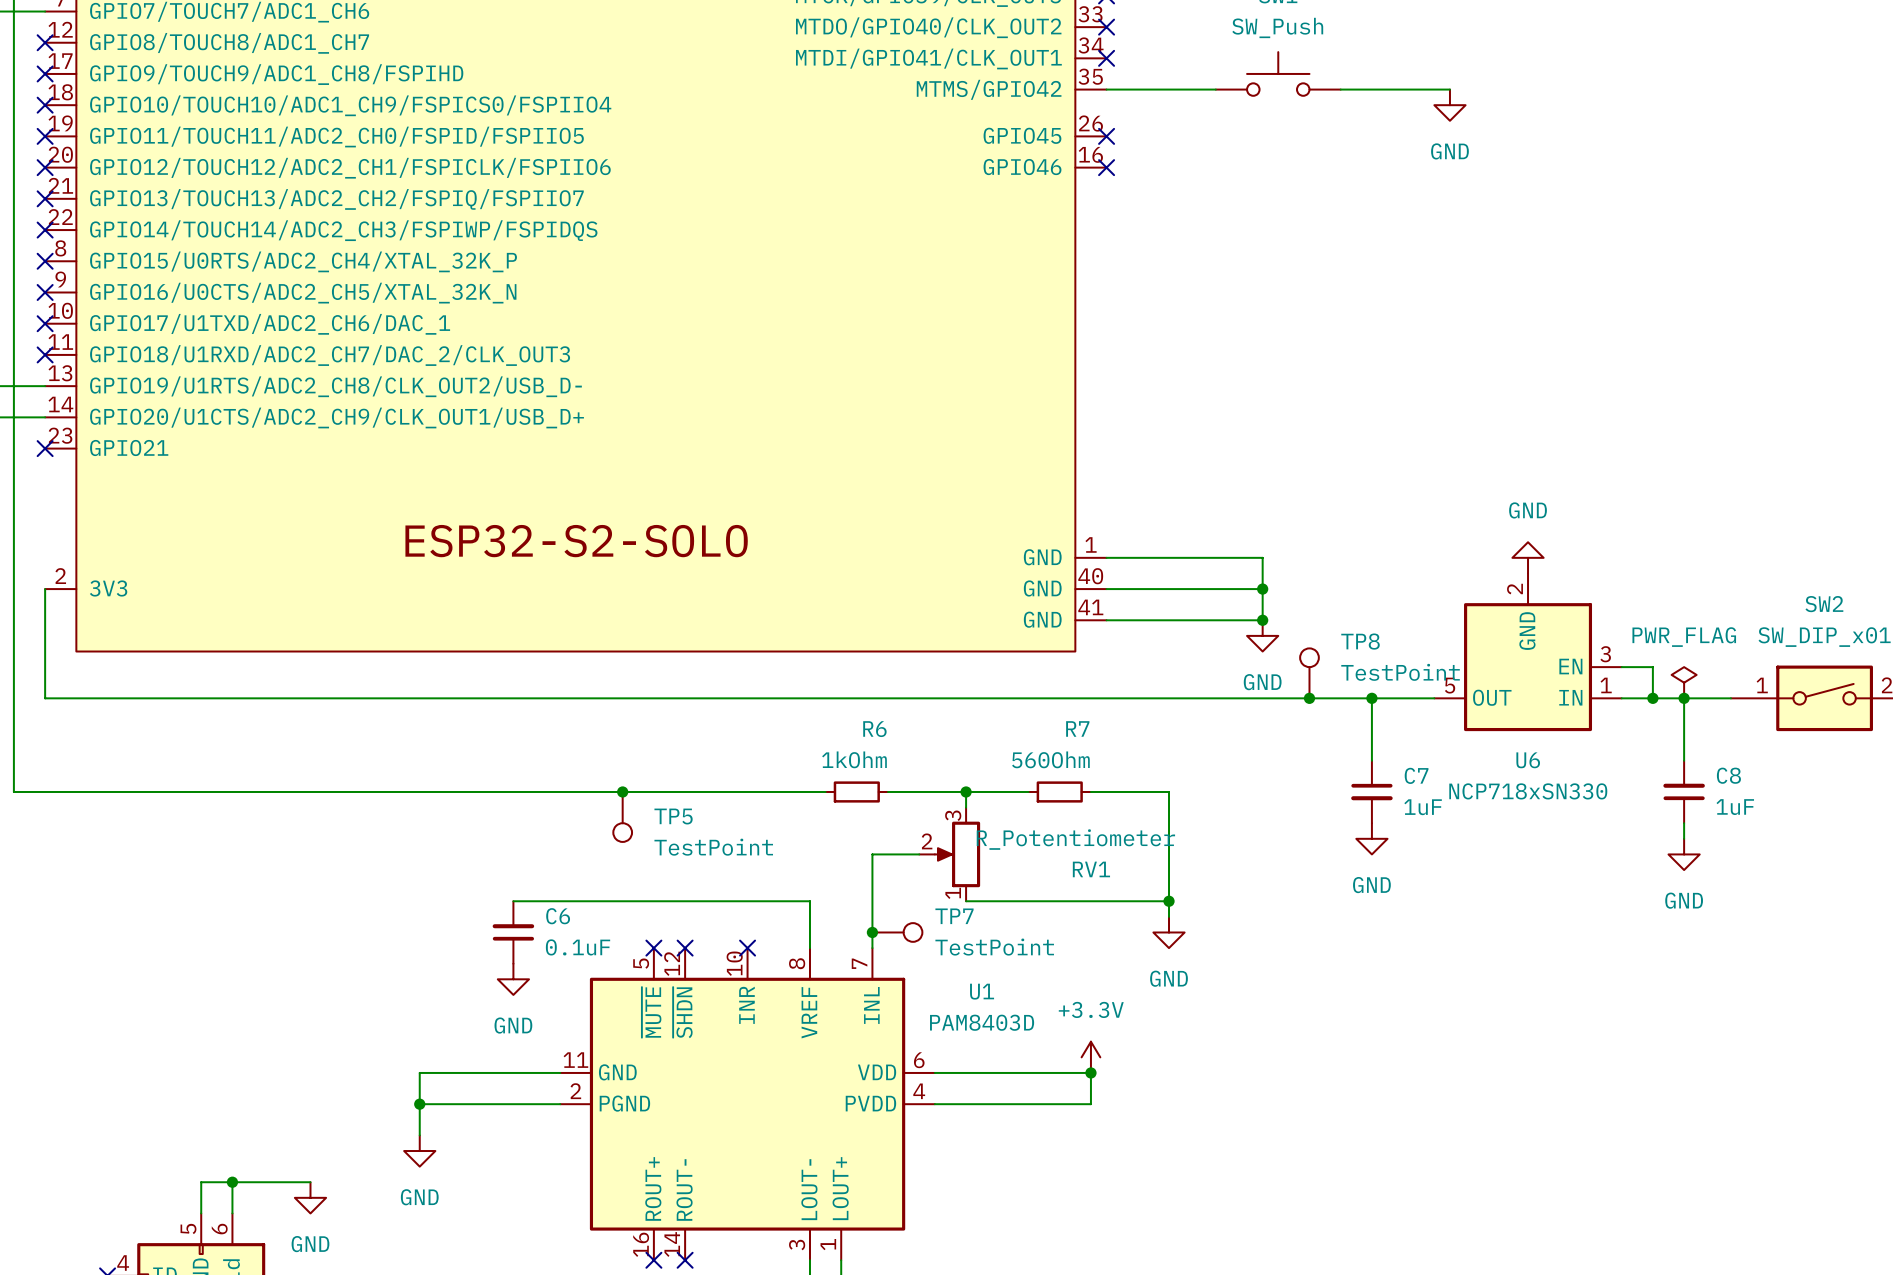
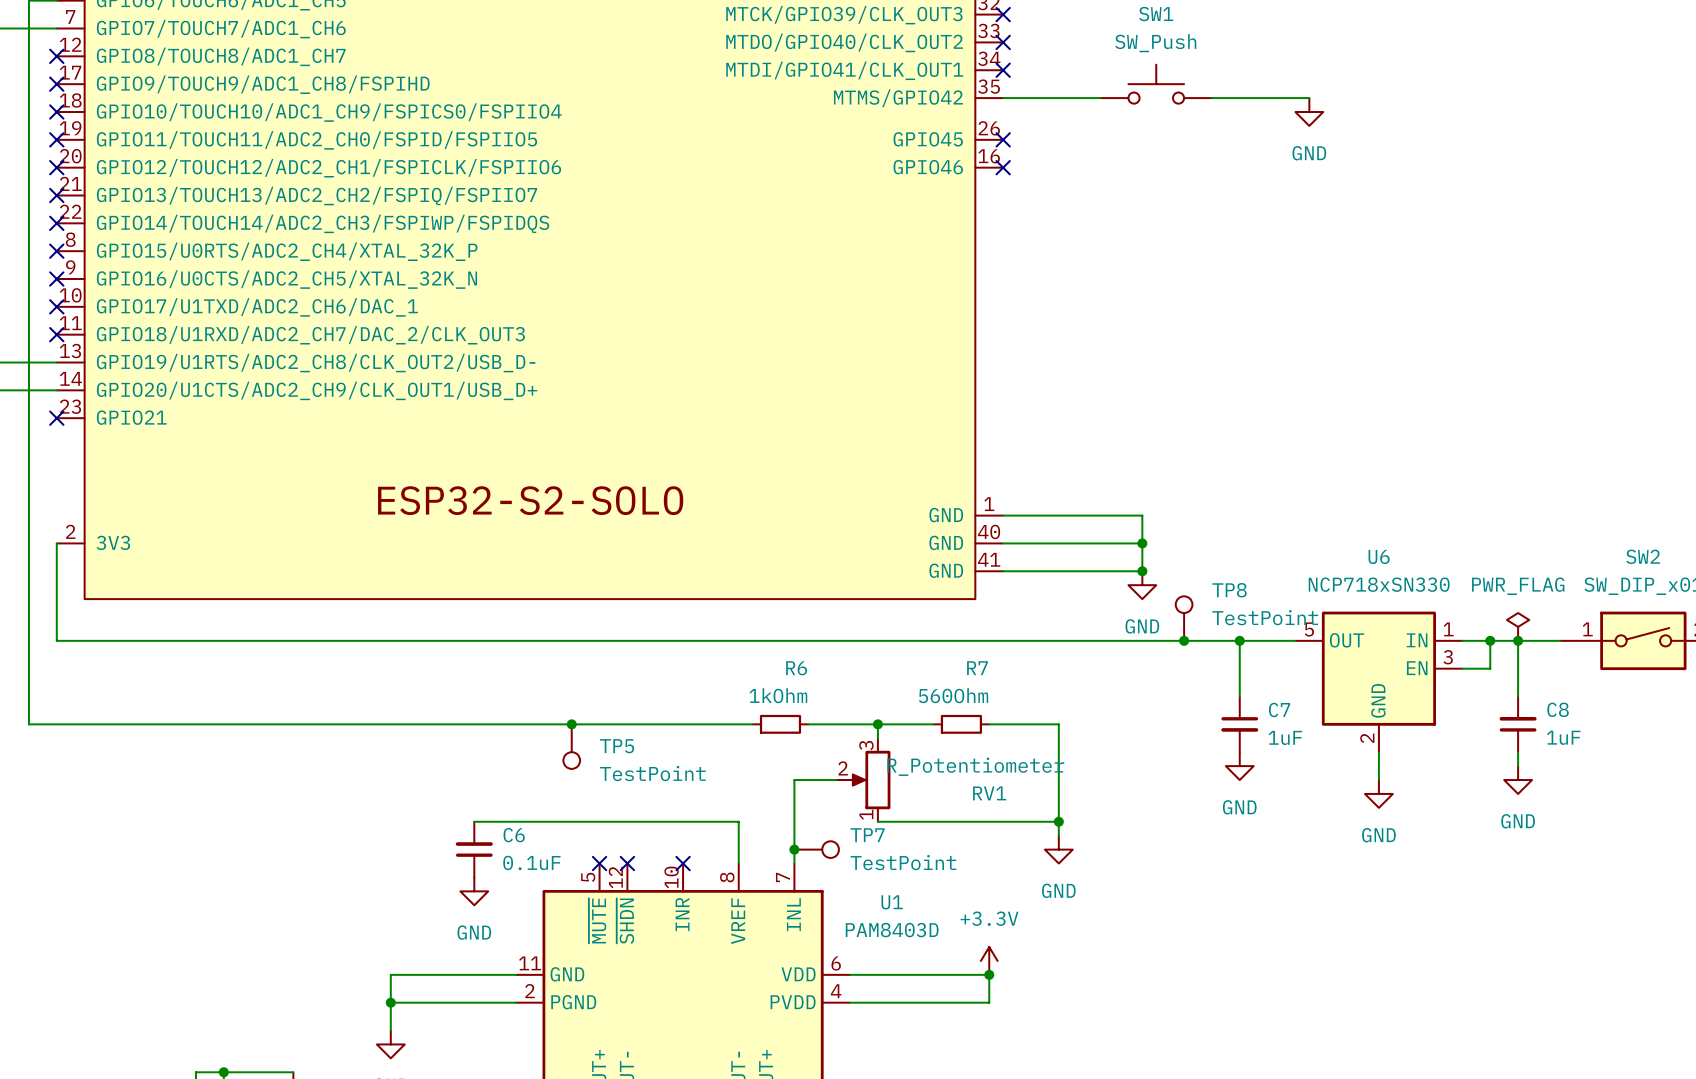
power symbol: GND (1528, 557) -> none
U6 flip: as is (1528, 667) -> up-down (1378, 668)
wire: (1621, 667) (1652, 667) (1652, 698) -> (1462, 668) (1490, 668) (1490, 640)
U6 name position: U6 (1528, 760) -> U6 (1379, 556)
U6 value position: NCP718xSN330 (1528, 791) -> NCP718xSN330 (1379, 584)
wire: none -> (1378, 752) (1378, 780)
power symbol: none -> GND (1378, 793)

